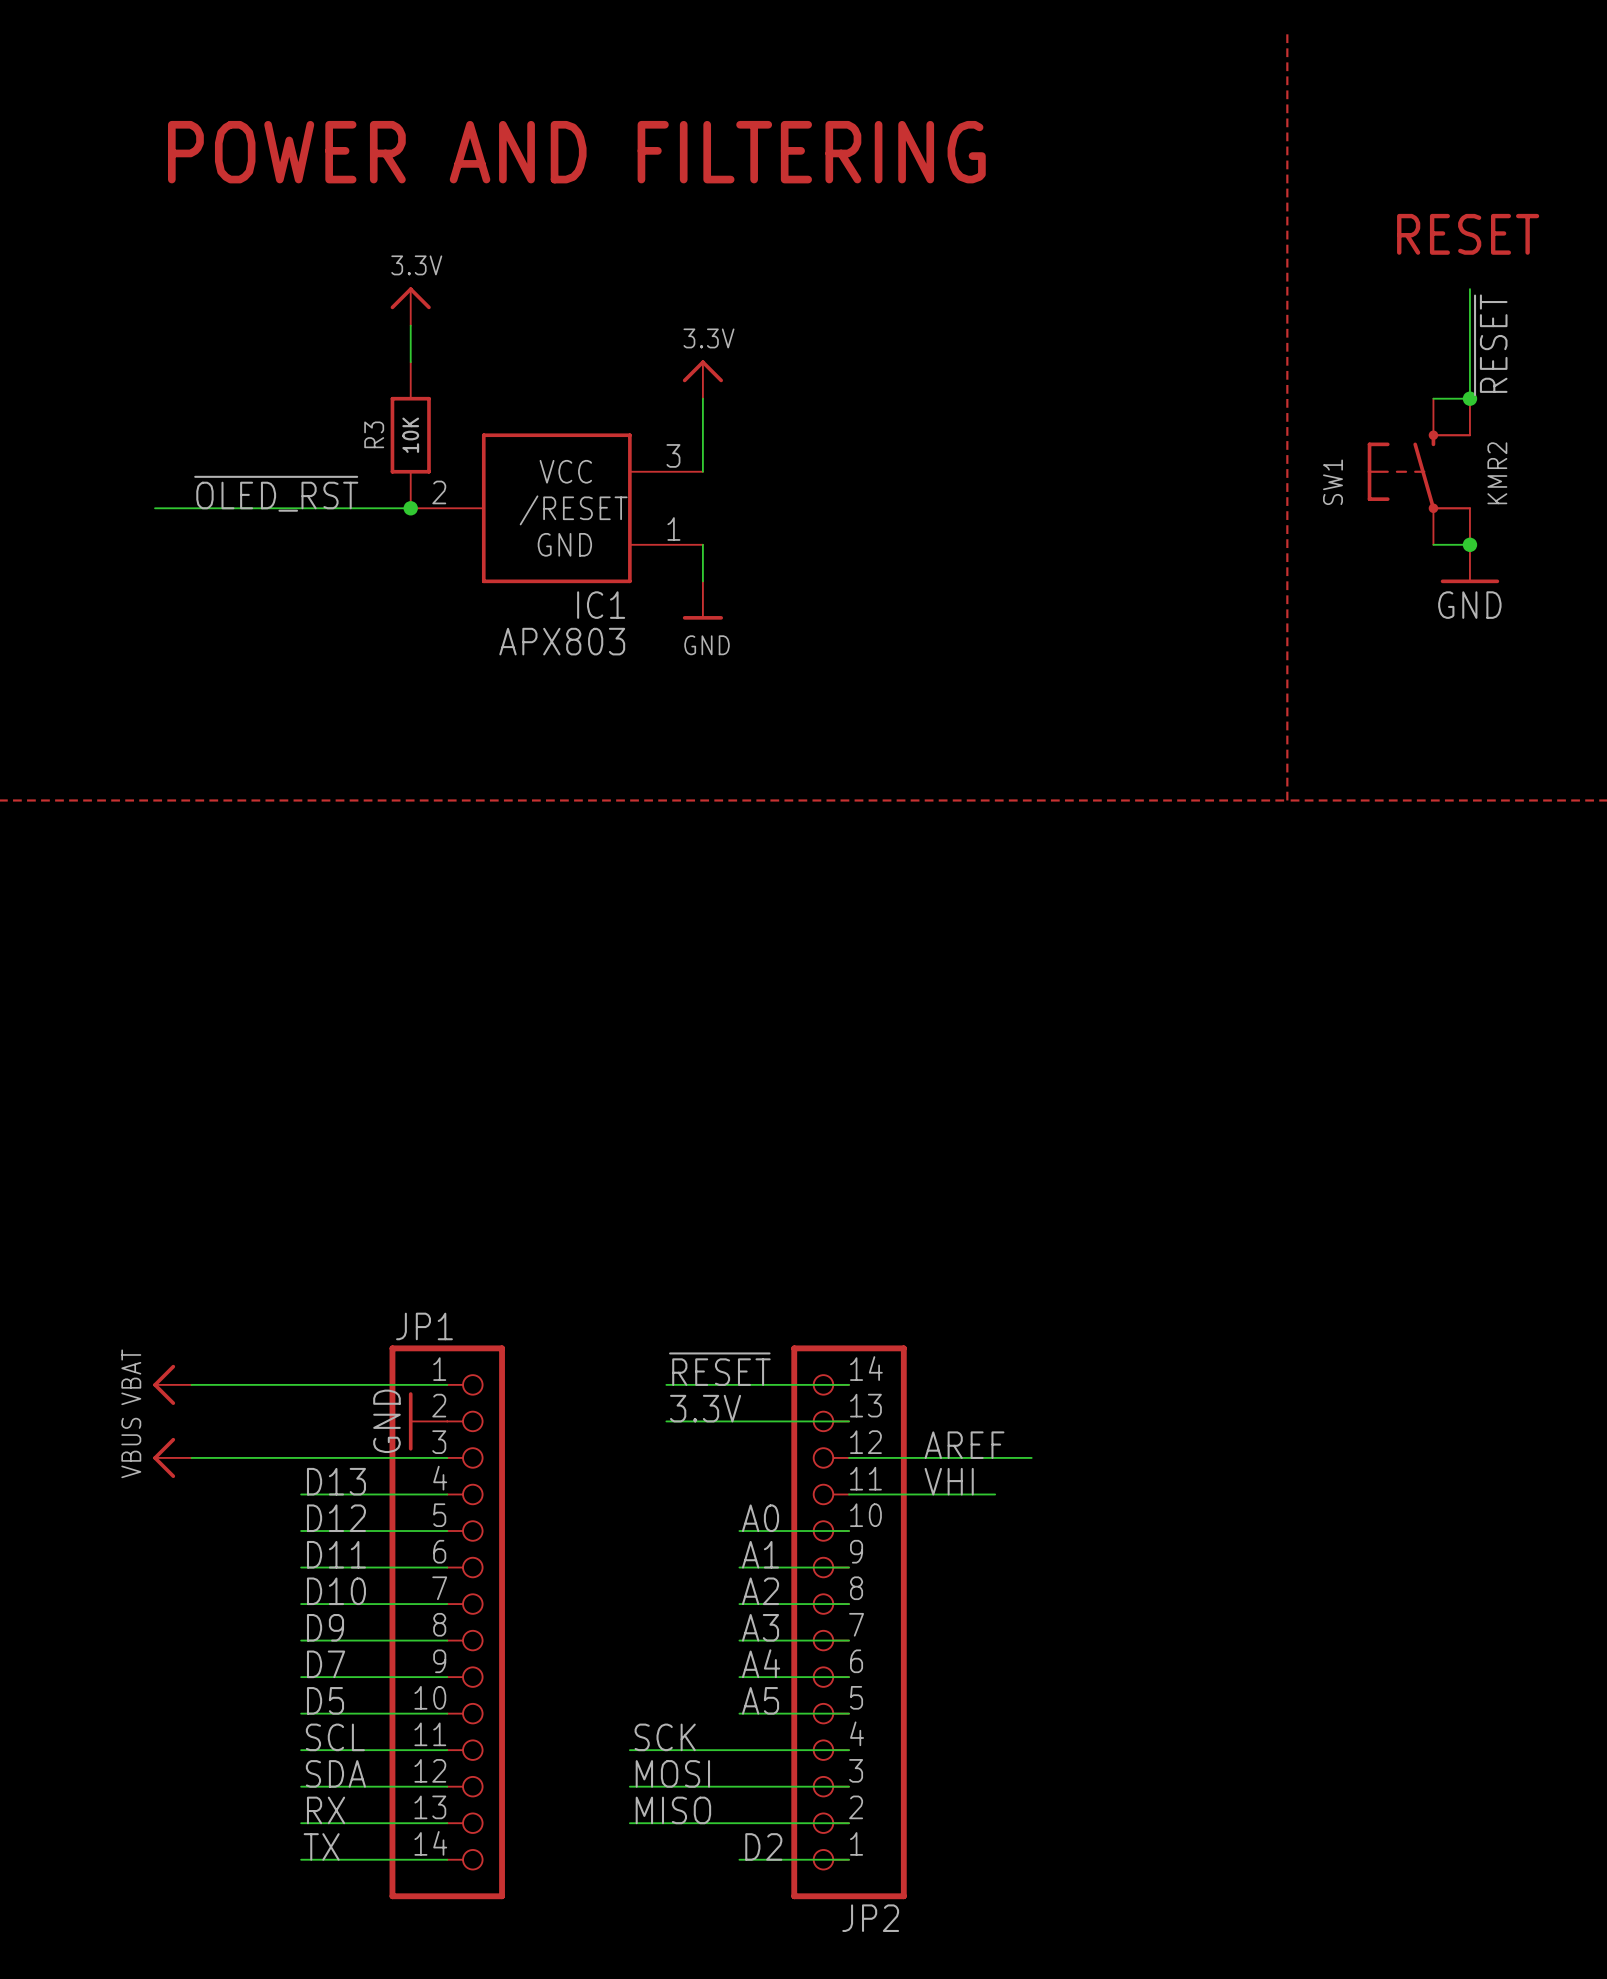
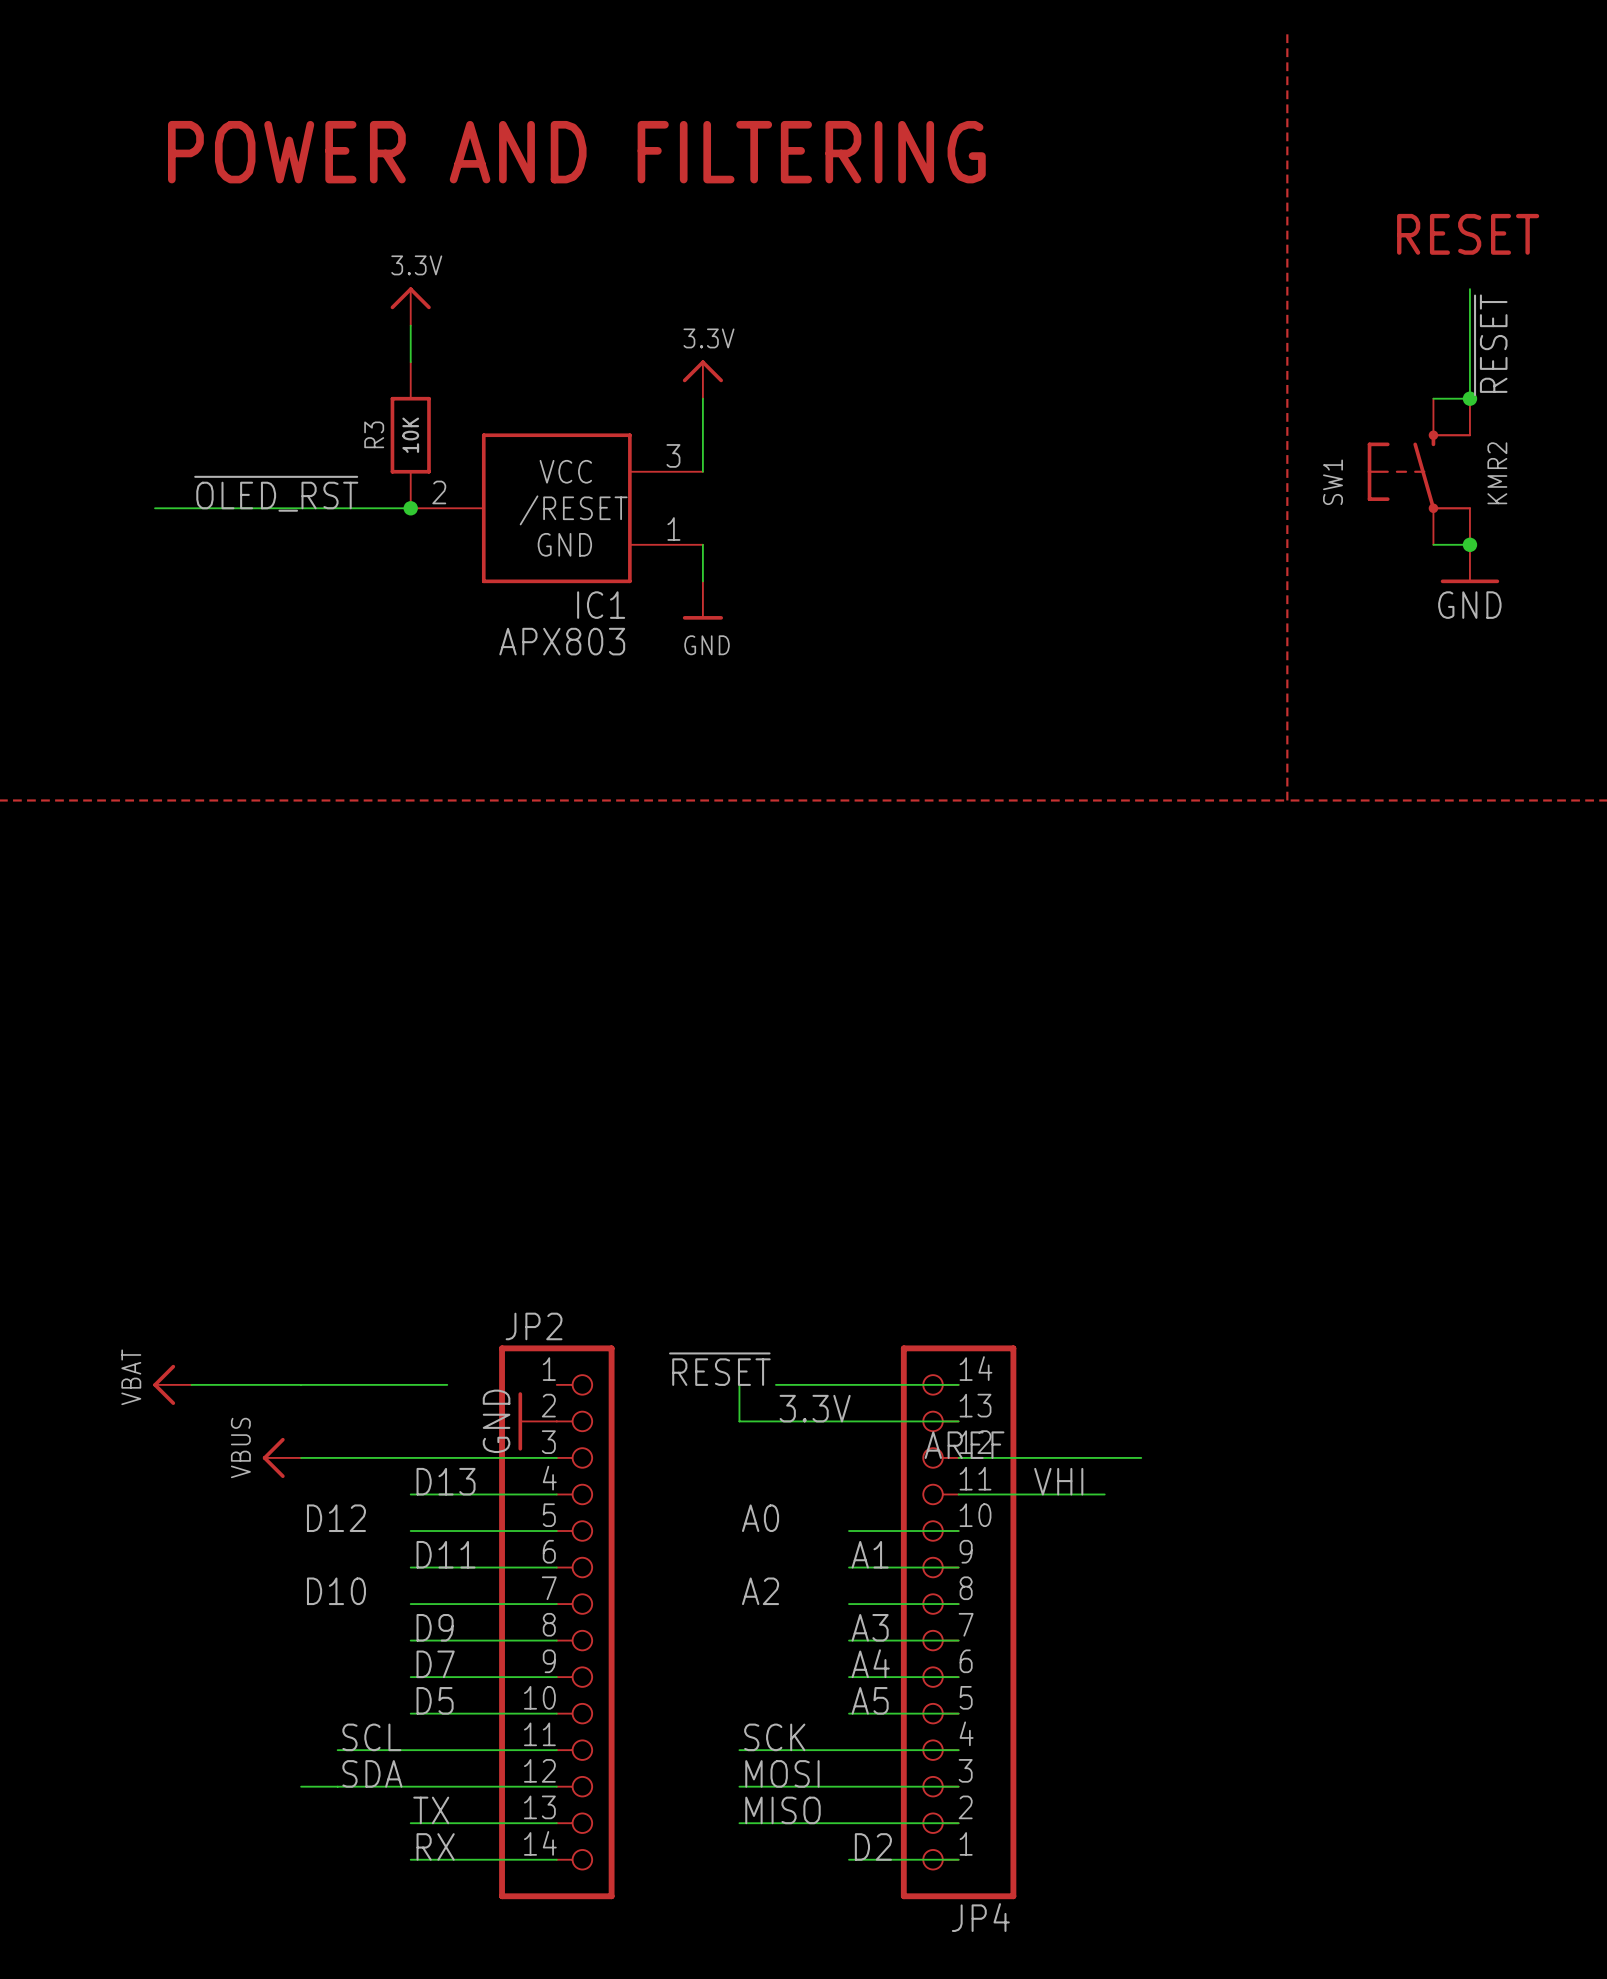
wire: (666, 1384) (775, 1384) -> (849, 1421) (958, 1421)
label position: 3.3V (705, 1408) -> 3.3V (815, 1408)
power symbol position: GND (428, 1421) -> GND (537, 1421)
wire: (666, 1421) (739, 1421) -> (739, 1384) (739, 1421)
power symbol position: VBUS (172, 1457) -> VBUS (281, 1457)
wire: (191, 1457) (301, 1457) -> (447, 1457) (556, 1457)
wire: (849, 1457) (958, 1457) -> (849, 1384) (958, 1384)
wire: none -> (1031, 1457) (1141, 1457)
label position: D13 (336, 1481) -> D13 (446, 1481)
label position: VHI (949, 1481) -> VHI (1058, 1481)
wire: (301, 1494) (410, 1494) -> (447, 1494) (556, 1494)
wire: (849, 1494) (958, 1494) -> (995, 1494) (1104, 1494)
wire: (301, 1531) (410, 1531) -> (447, 1531) (556, 1531)
wire: (739, 1531) (849, 1531) -> (958, 1531) (849, 1531)
label position: D11 (336, 1554) -> D11 (446, 1554)
label position: A1 (760, 1554) -> A1 (870, 1554)
wire: (301, 1567) (410, 1567) -> (447, 1567) (556, 1567)
wire: (739, 1567) (849, 1567) -> (958, 1567) (849, 1567)
wire: (301, 1604) (410, 1604) -> (447, 1604) (556, 1604)
wire: (739, 1604) (849, 1604) -> (958, 1604) (849, 1604)
JP1: (447, 1622) -> none
JP2 rotation: 0° (849, 1622) -> 180° (556, 1622)
JP4: none -> (958, 1622)
label position: D9 (325, 1627) -> D9 (435, 1627)
label position: A3 (760, 1627) -> A3 (870, 1627)
wire: (301, 1640) (410, 1640) -> (447, 1640) (556, 1640)
wire: (739, 1640) (849, 1640) -> (958, 1640) (849, 1640)
label position: A4 (761, 1663) -> A4 (870, 1663)
label position: D7 (326, 1664) -> D7 (435, 1664)
wire: (301, 1677) (410, 1677) -> (447, 1677) (556, 1677)
wire: (739, 1677) (849, 1677) -> (958, 1677) (849, 1677)
label position: D5 (325, 1700) -> D5 (435, 1700)
label position: A5 (760, 1700) -> A5 (870, 1700)
wire: (301, 1713) (410, 1713) -> (447, 1713) (556, 1713)
wire: (739, 1713) (849, 1713) -> (958, 1713) (849, 1713)
label position: SCL (335, 1737) -> SCL (371, 1737)
label position: SCK (665, 1737) -> SCK (774, 1737)
wire: (301, 1750) (337, 1750) -> none
wire: (629, 1750) (739, 1750) -> (447, 1750) (556, 1750)
wire: none -> (849, 1750) (958, 1750)
label position: SDA (335, 1773) -> SDA (372, 1773)
label position: MOSI (672, 1773) -> MOSI (782, 1773)
wire: (629, 1786) (739, 1786) -> (447, 1786) (556, 1786)
wire: none -> (849, 1786) (958, 1786)
label position: RX (326, 1810) -> RX (435, 1846)
label position: MISO (673, 1810) -> MISO (782, 1810)
wire: (301, 1823) (410, 1823) -> (447, 1823) (556, 1823)
wire: (629, 1823) (739, 1823) -> (849, 1823) (958, 1823)
label position: TX (321, 1846) -> TX (431, 1810)
label position: D2 (763, 1846) -> D2 (873, 1846)
wire: (301, 1859) (410, 1859) -> (447, 1859) (556, 1859)
wire: (739, 1859) (849, 1859) -> (958, 1859) (849, 1859)

